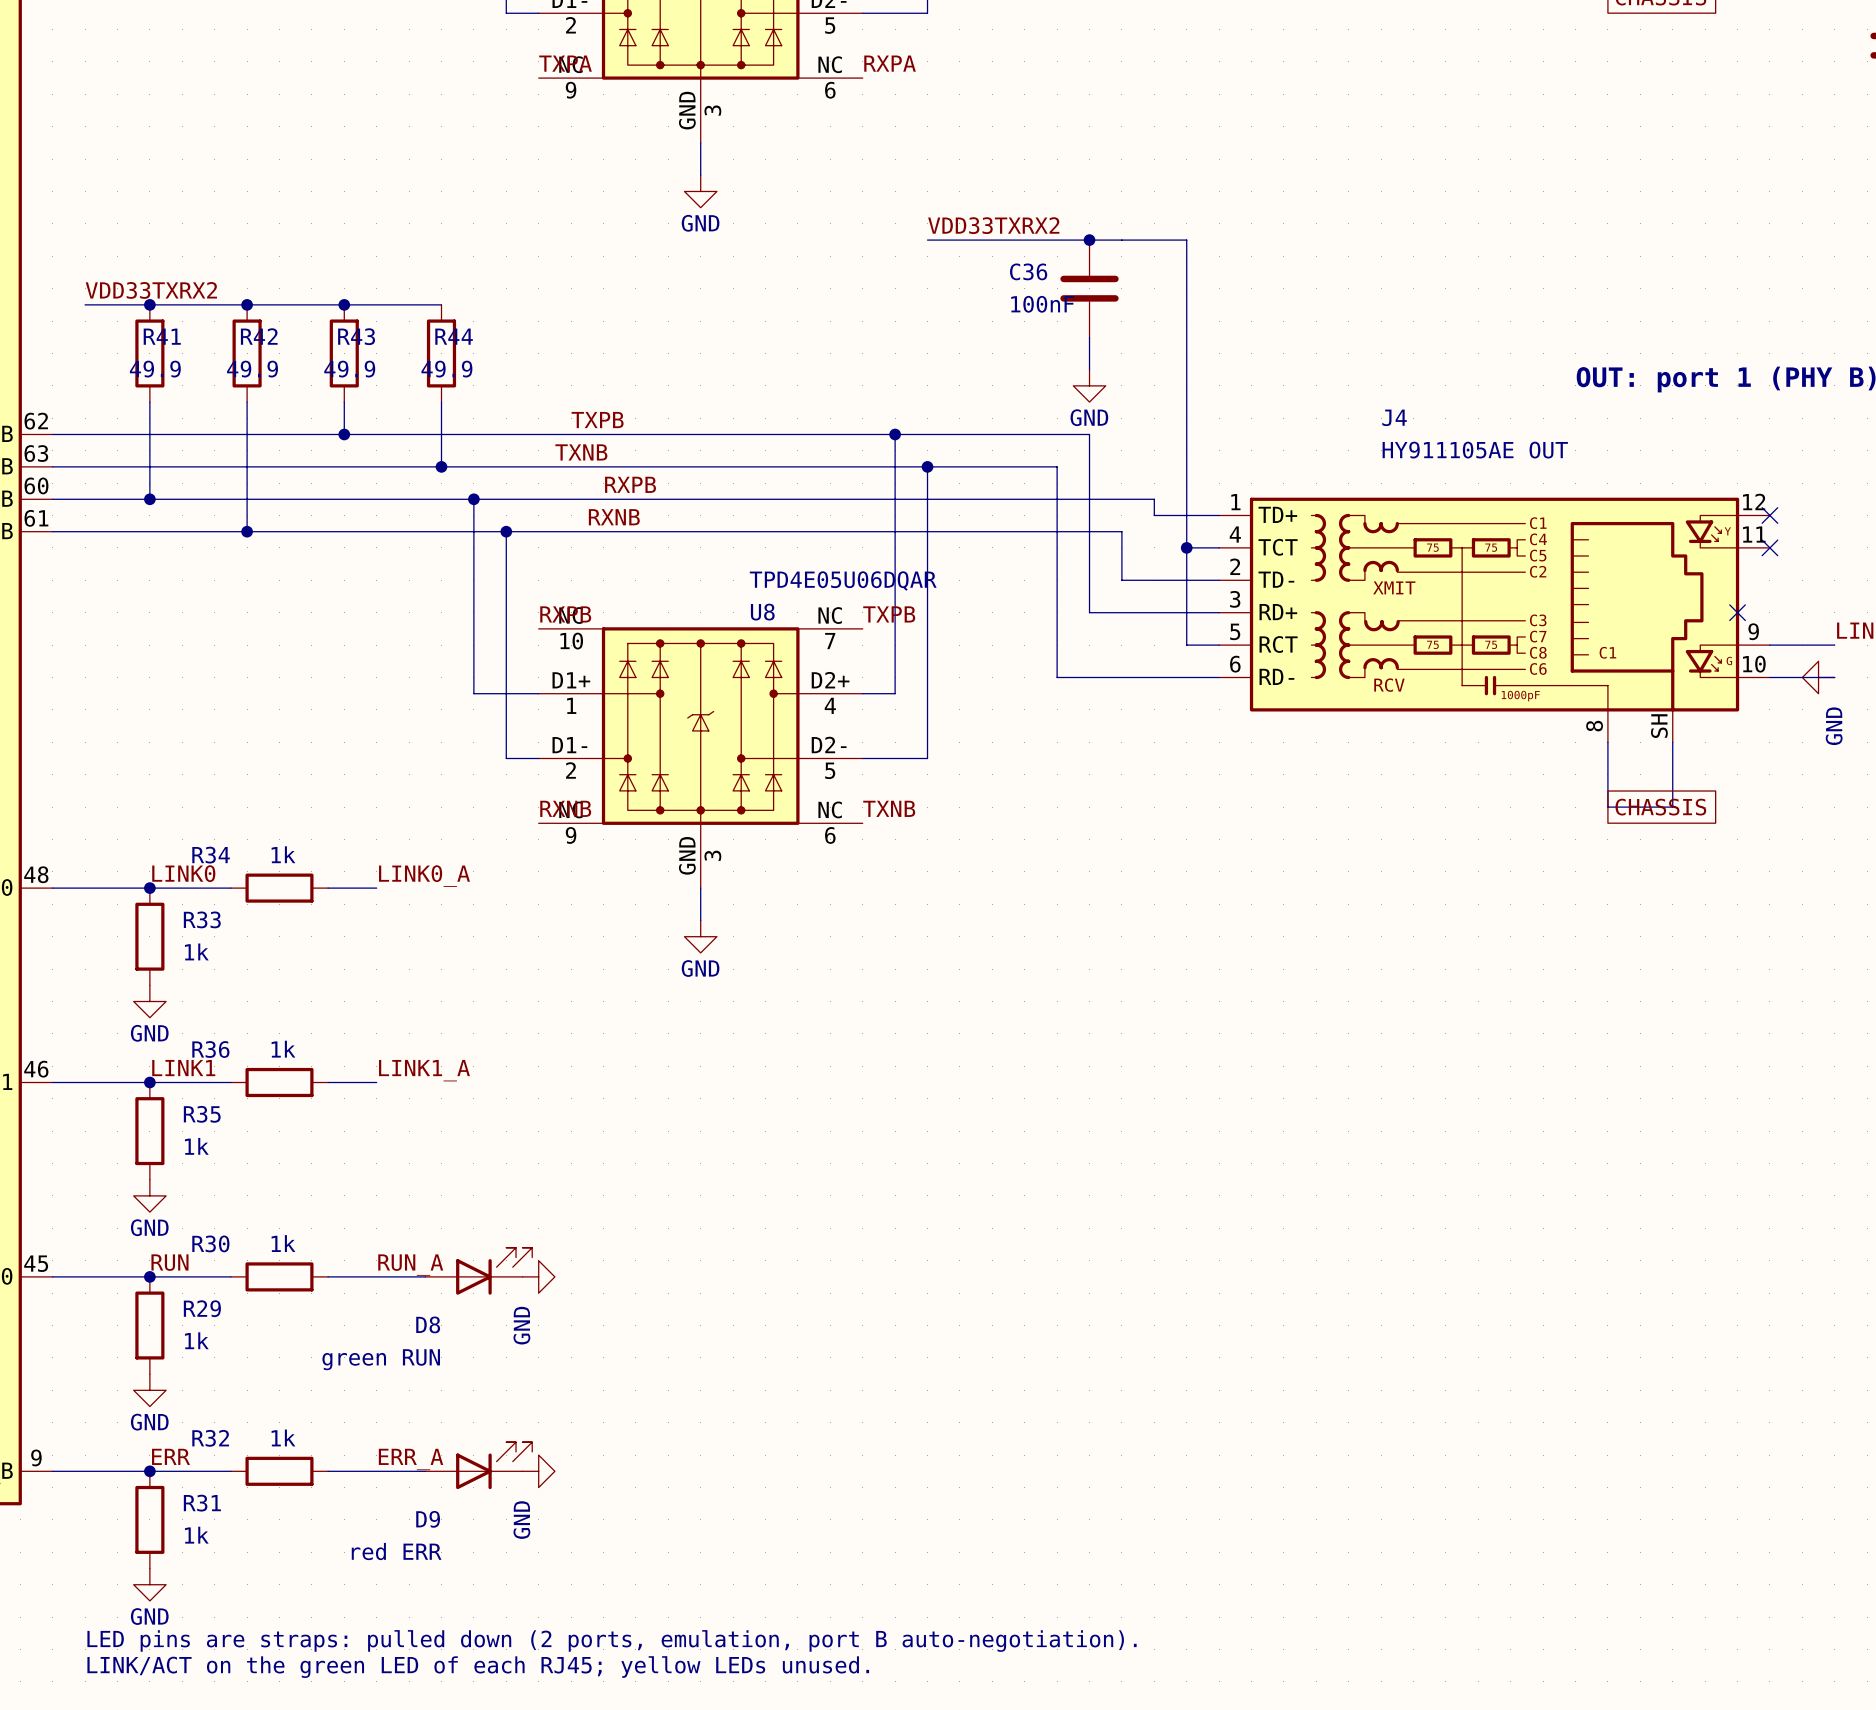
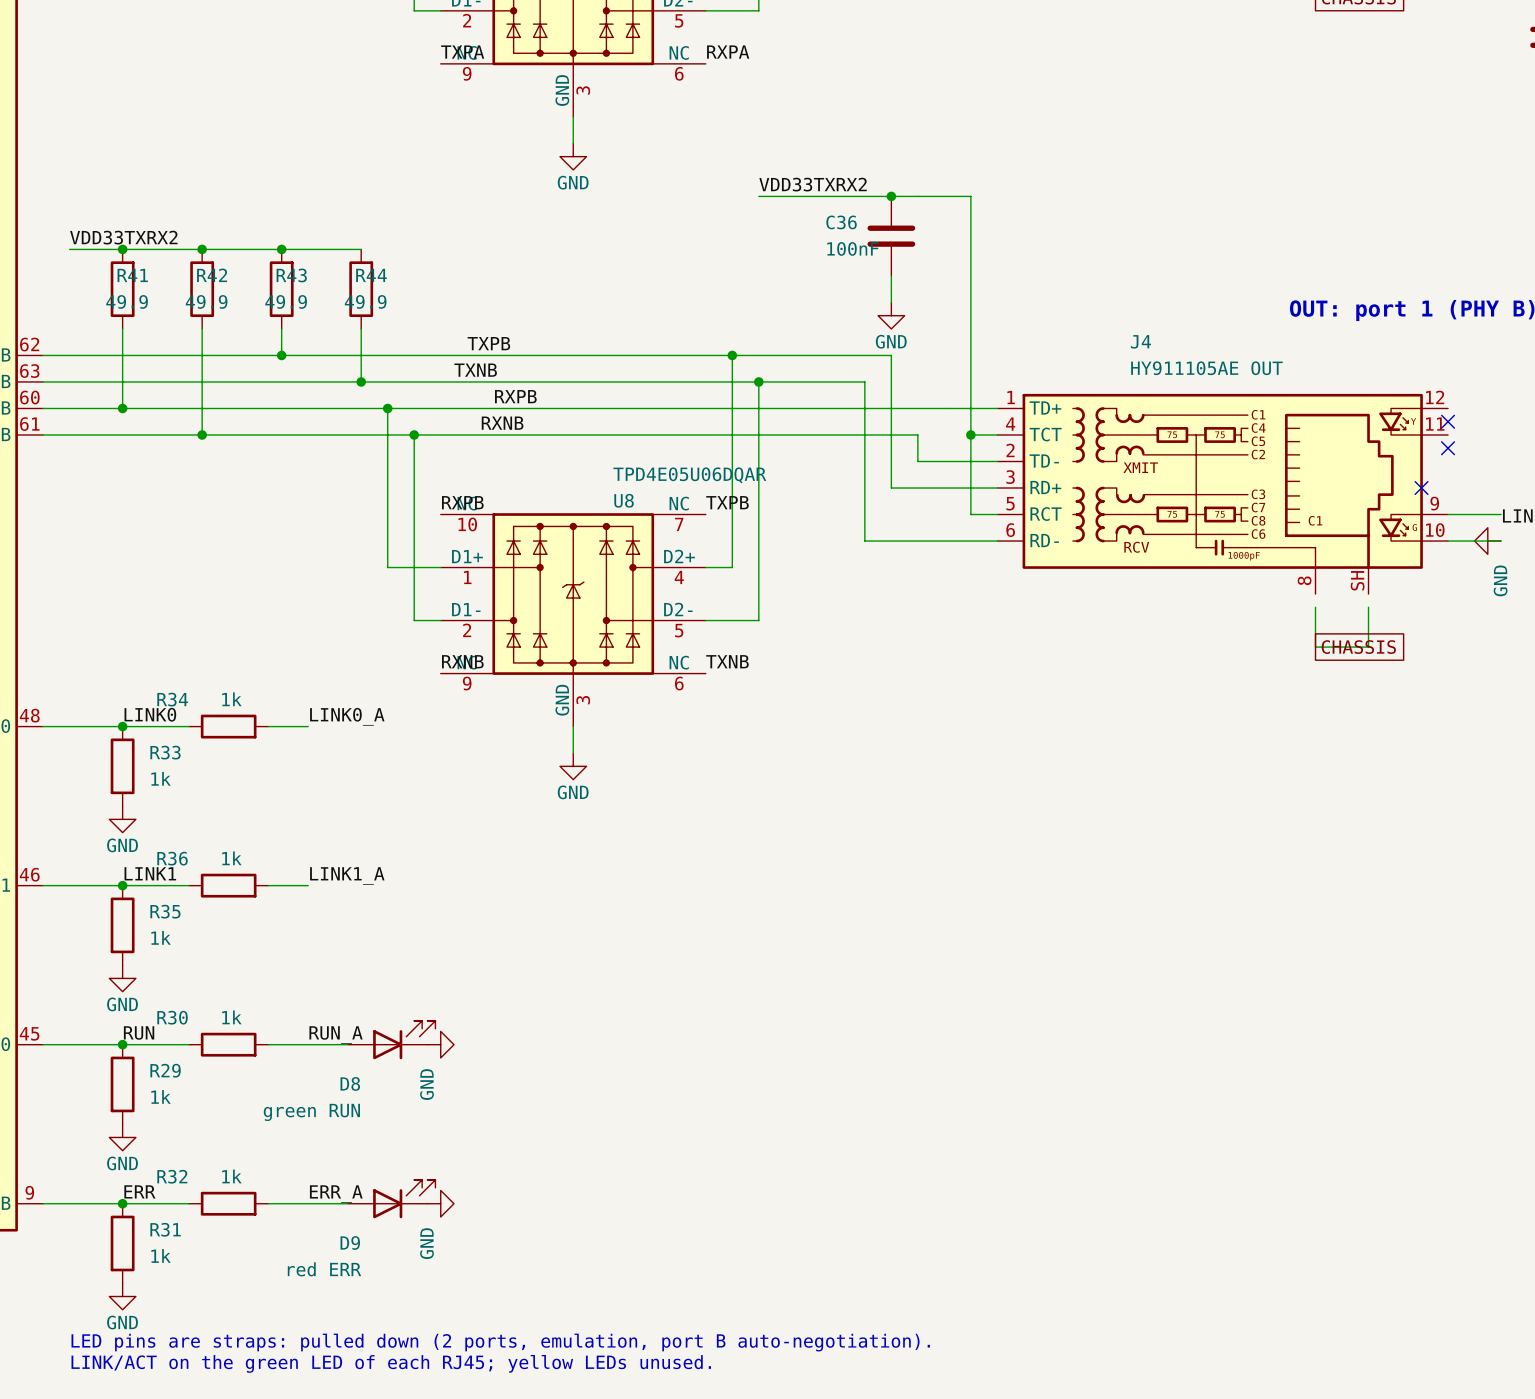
wire: (1154, 499) (1154, 515) (1219, 515) -> (944, 408) (997, 408)
wire: (1186, 547) (1219, 547) -> (970, 434) (997, 434)
junction position: (1186, 547) -> (970, 434)
wire: (1121, 564) (1121, 580) (1219, 580) -> (917, 461) (997, 461)
wire: (1089, 596) (1089, 612) (1219, 612) -> (891, 488) (997, 488)
no-connect mark position: (1737, 612) -> (1421, 488)
J4 position: (1494, 619) -> (1222, 493)
wire: (1186, 628) (1186, 645) (1219, 645) -> (970, 514) (997, 514)
wire: (1769, 645) (1834, 645) -> (1448, 514) (1501, 514)
wire: (1057, 661) (1057, 677) (1219, 677) -> (864, 541) (997, 541)
wire: (1769, 677) (1834, 677) -> (1448, 541) (1501, 541)
power symbol position: GND (1818, 677) -> GND (1487, 541)
global label position: CHASSIS (1660, 807) -> CHASSIS (1358, 647)

